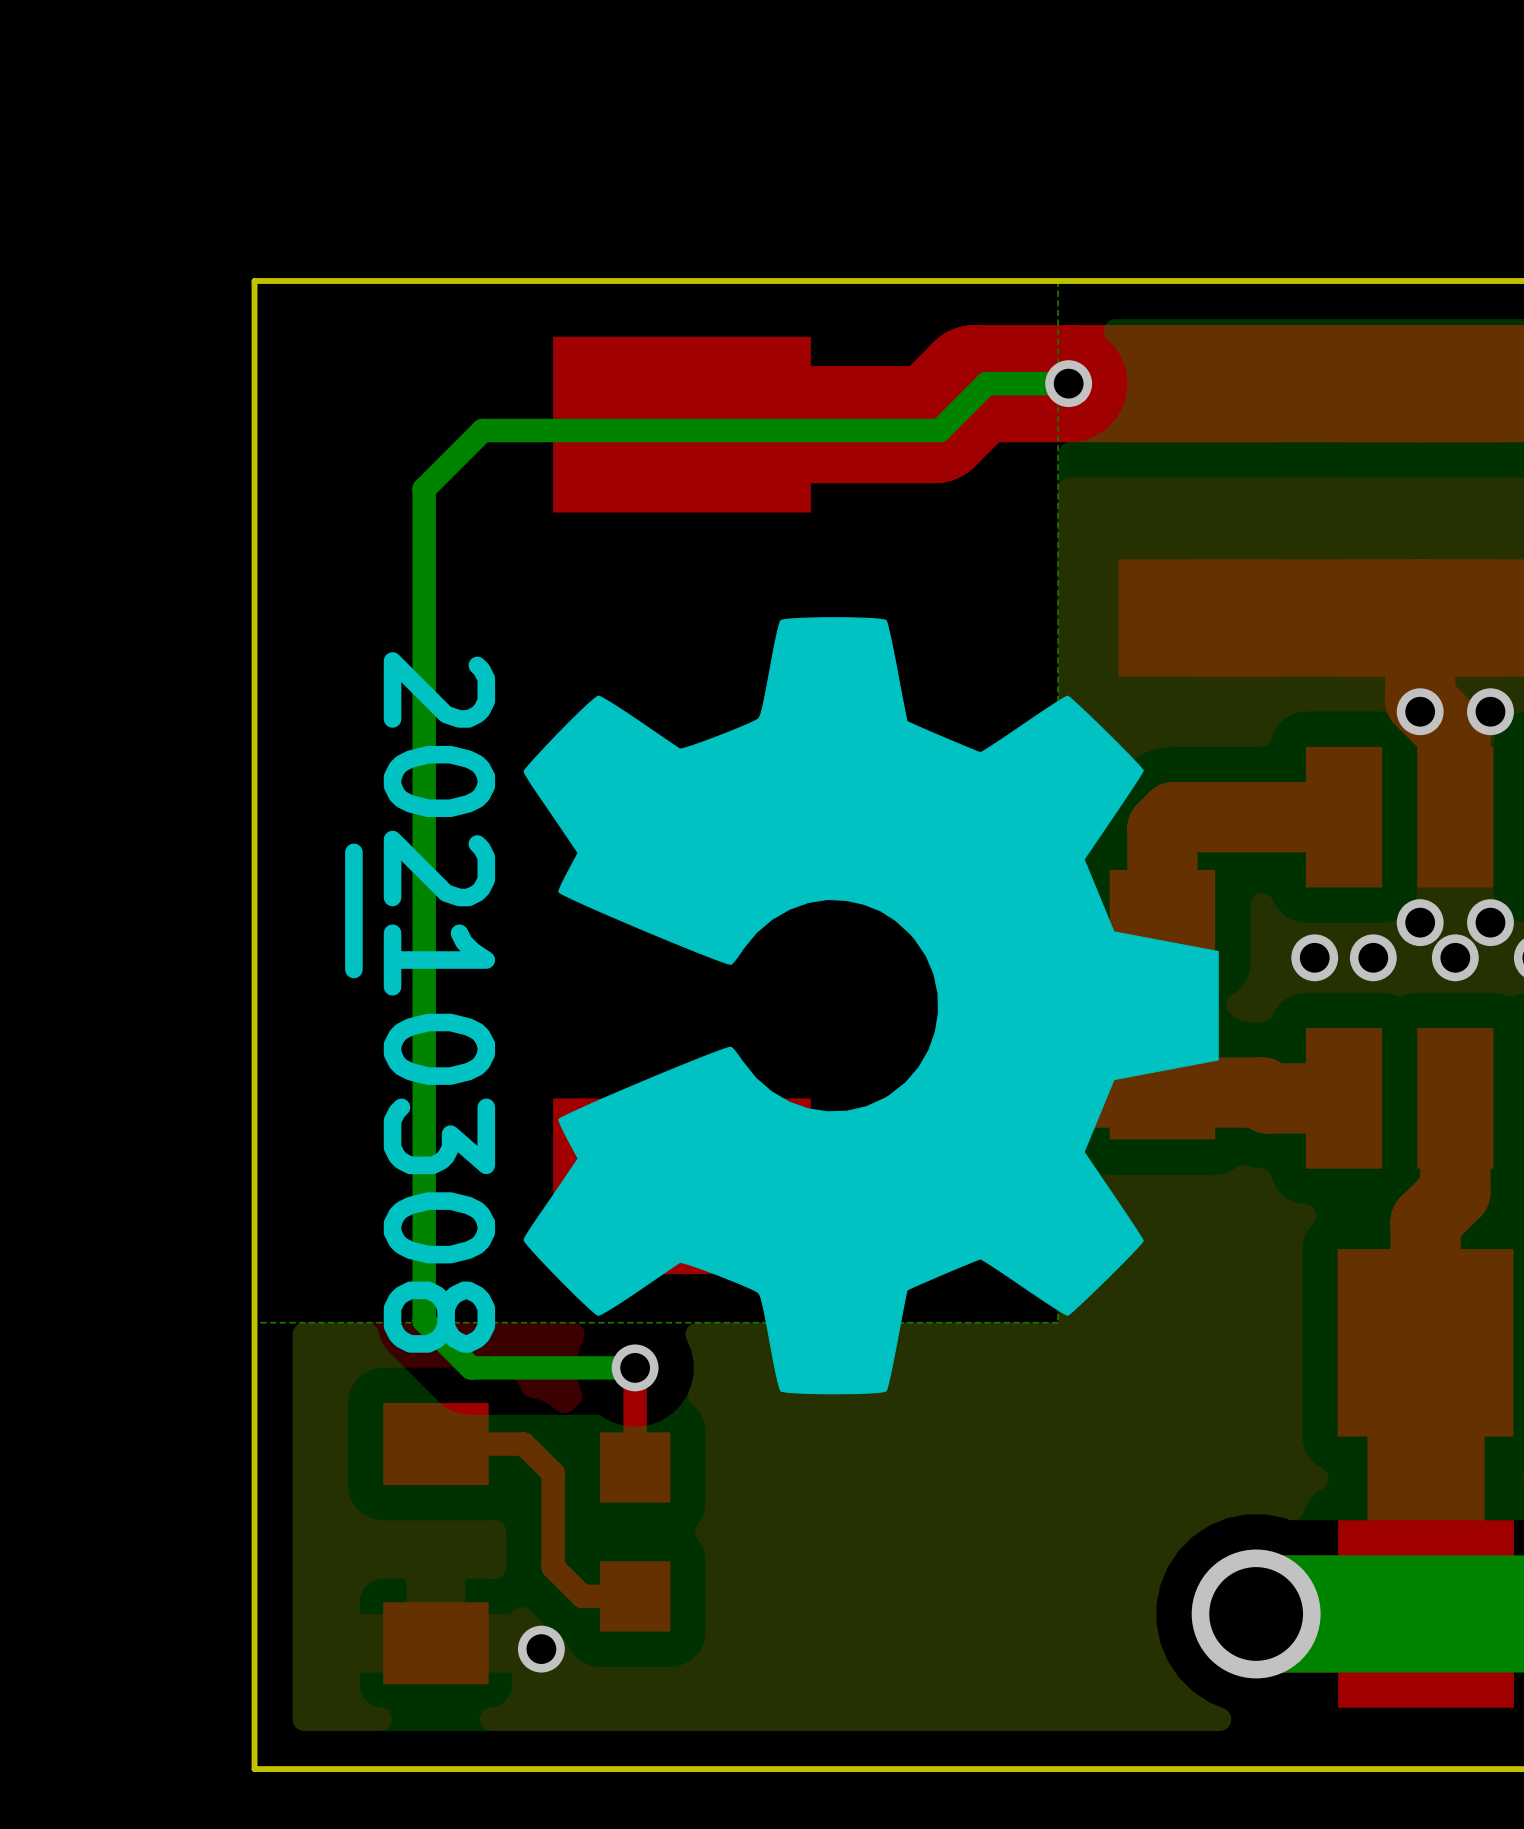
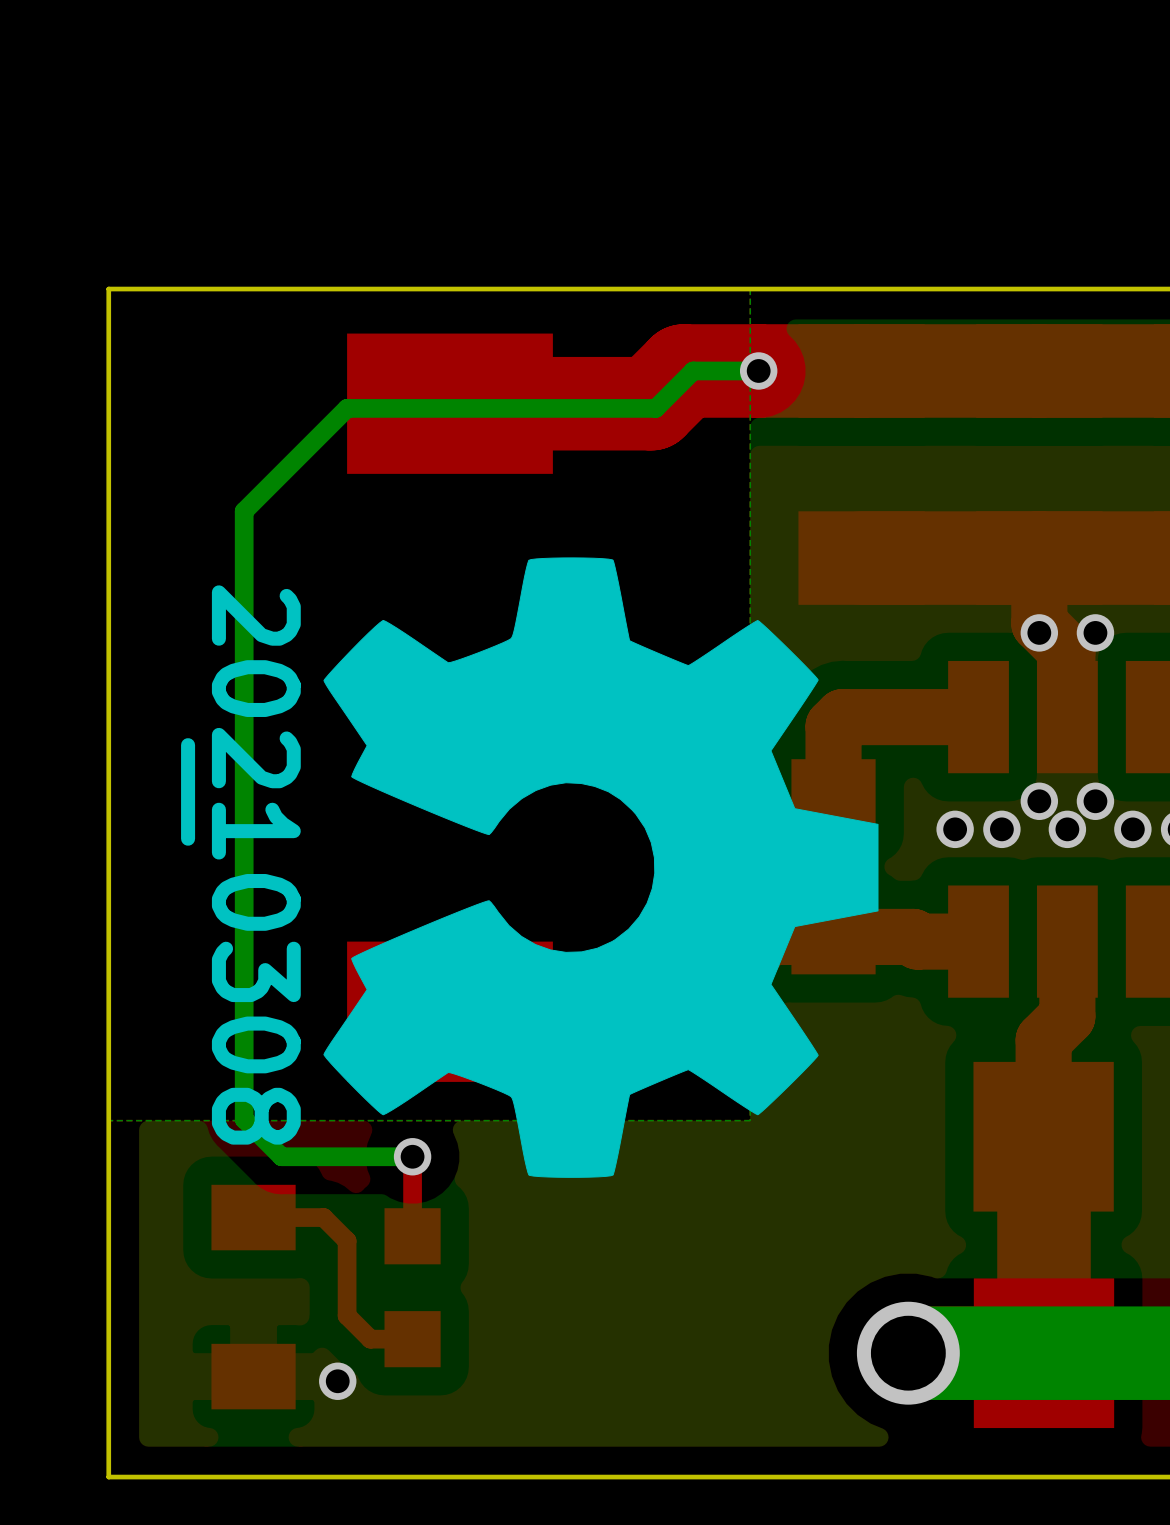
bottom track: (553, 430) (482, 430) (424, 489) (424, 559) -> (347, 408) (244, 511)

